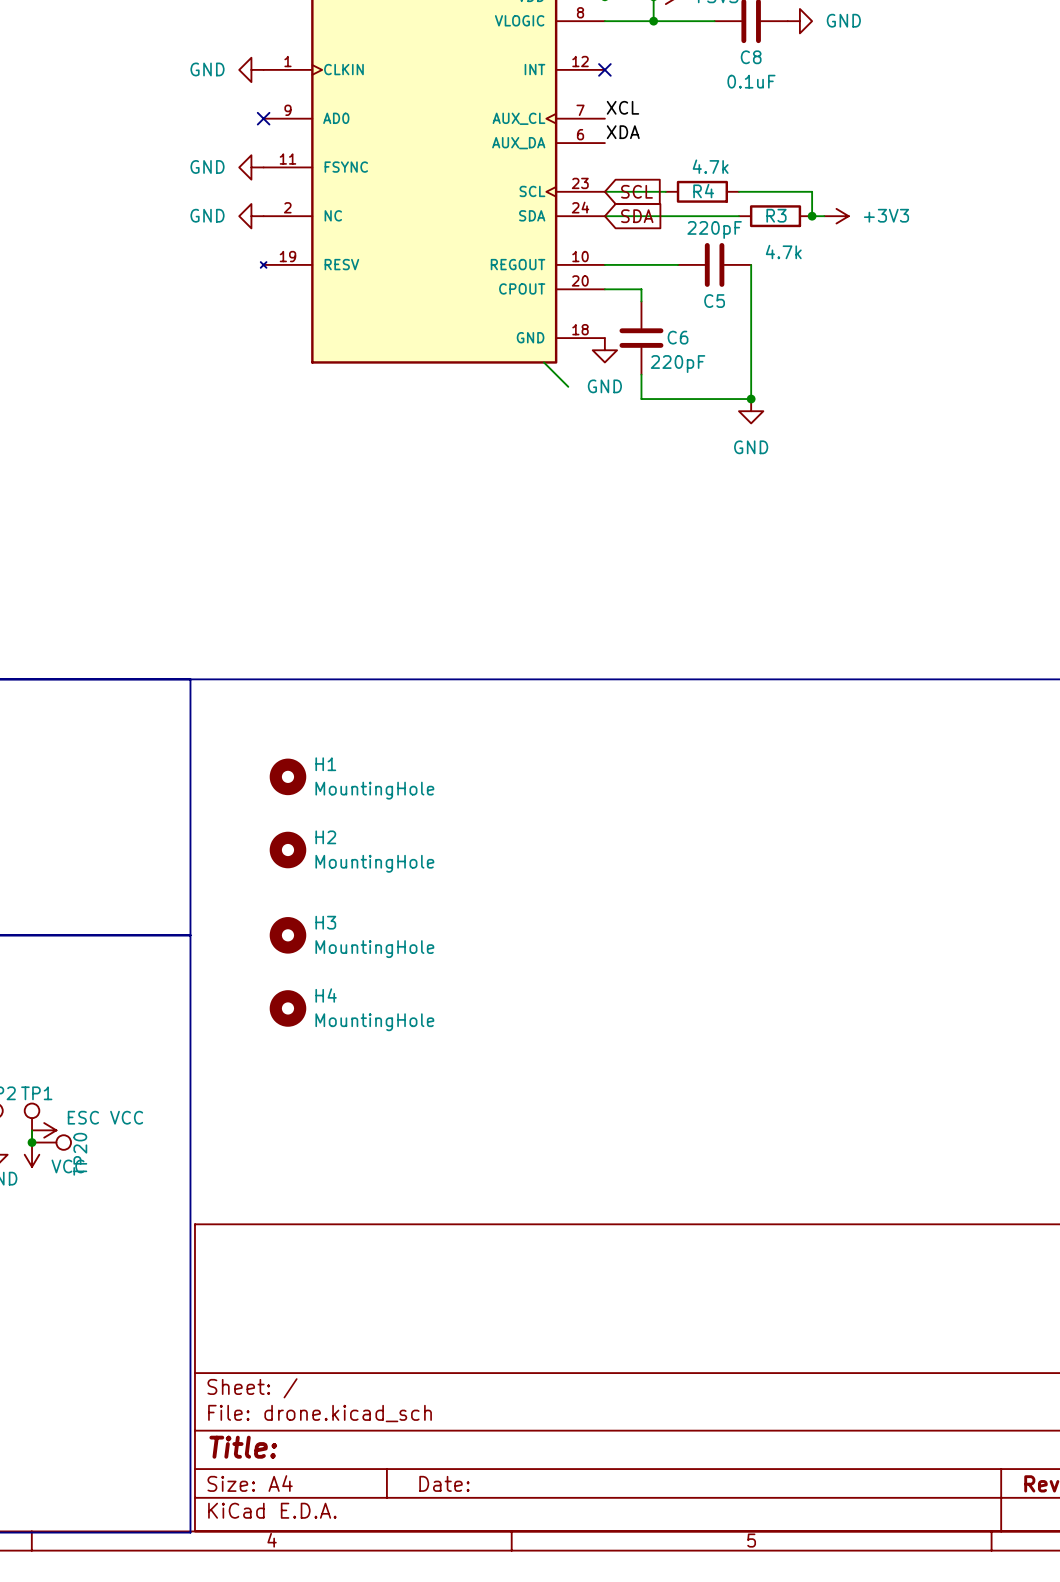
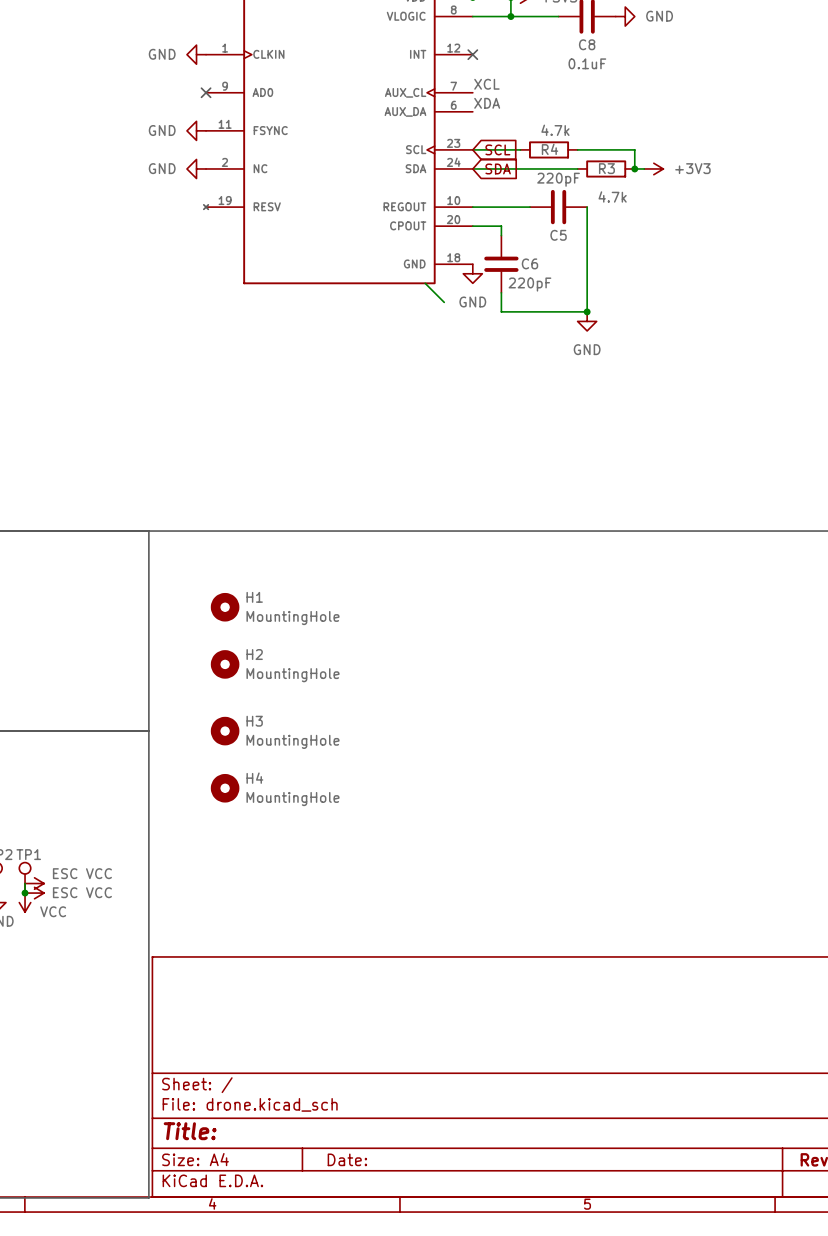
power symbol: none -> ESC VCC (34, 893)
TP20: (51, 1142) -> none

